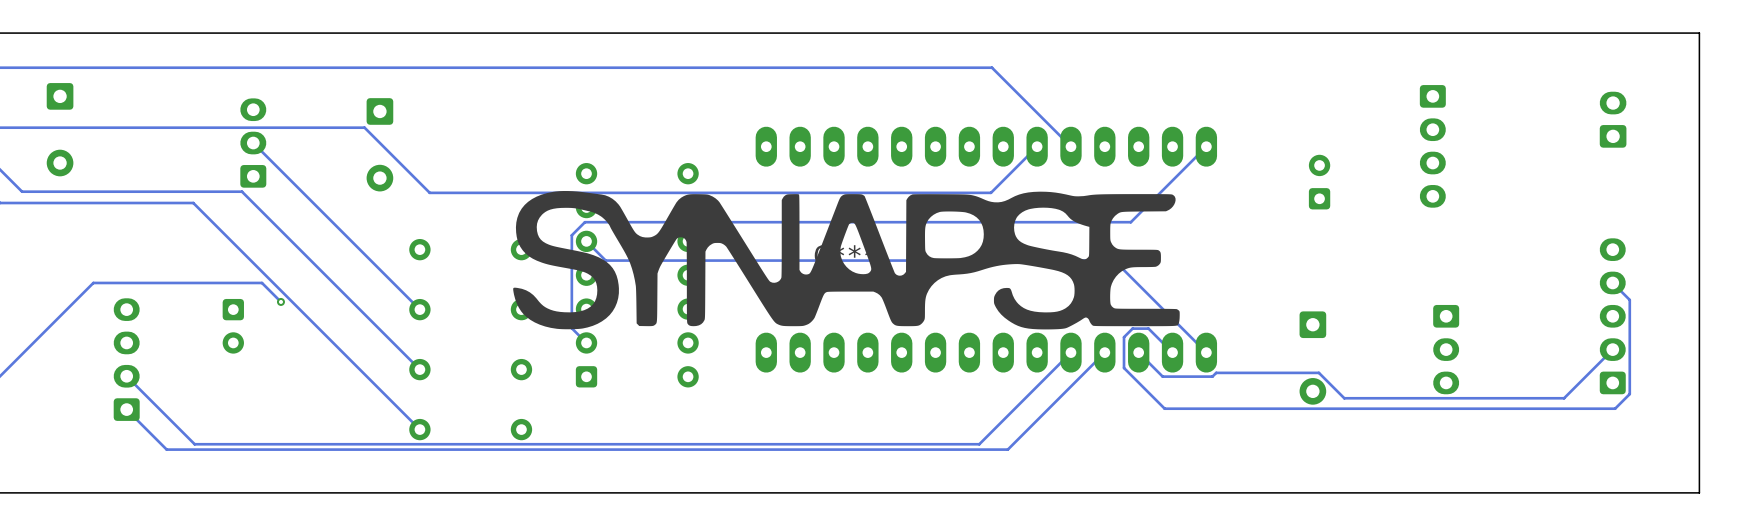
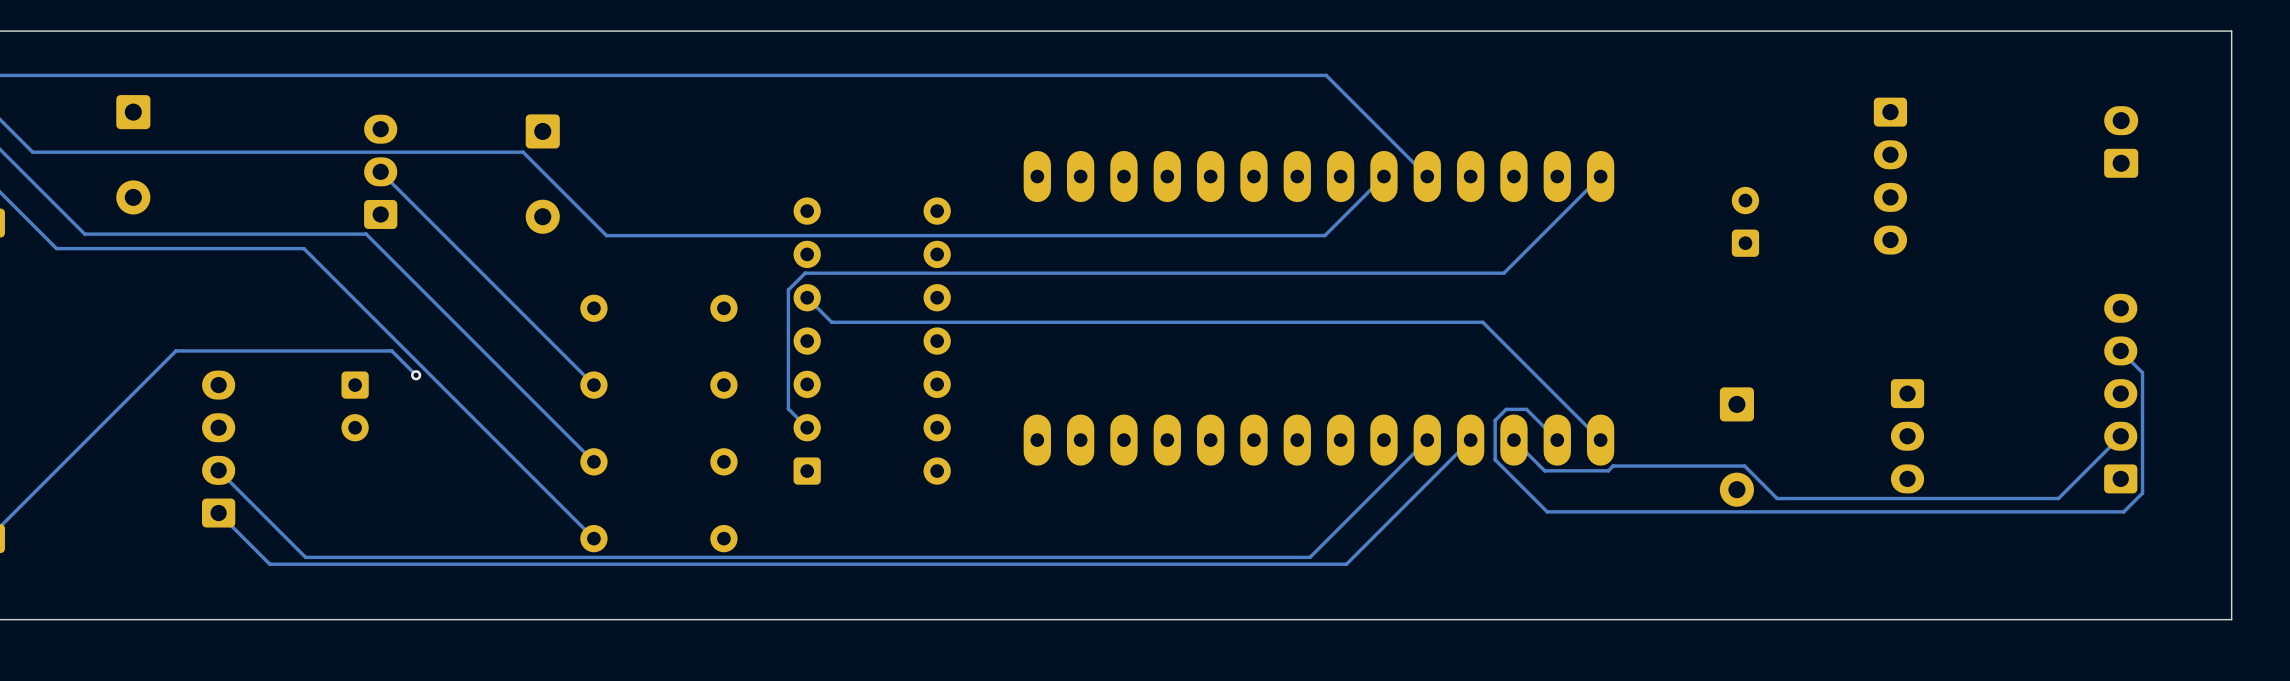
part: (846, 260) -> none

